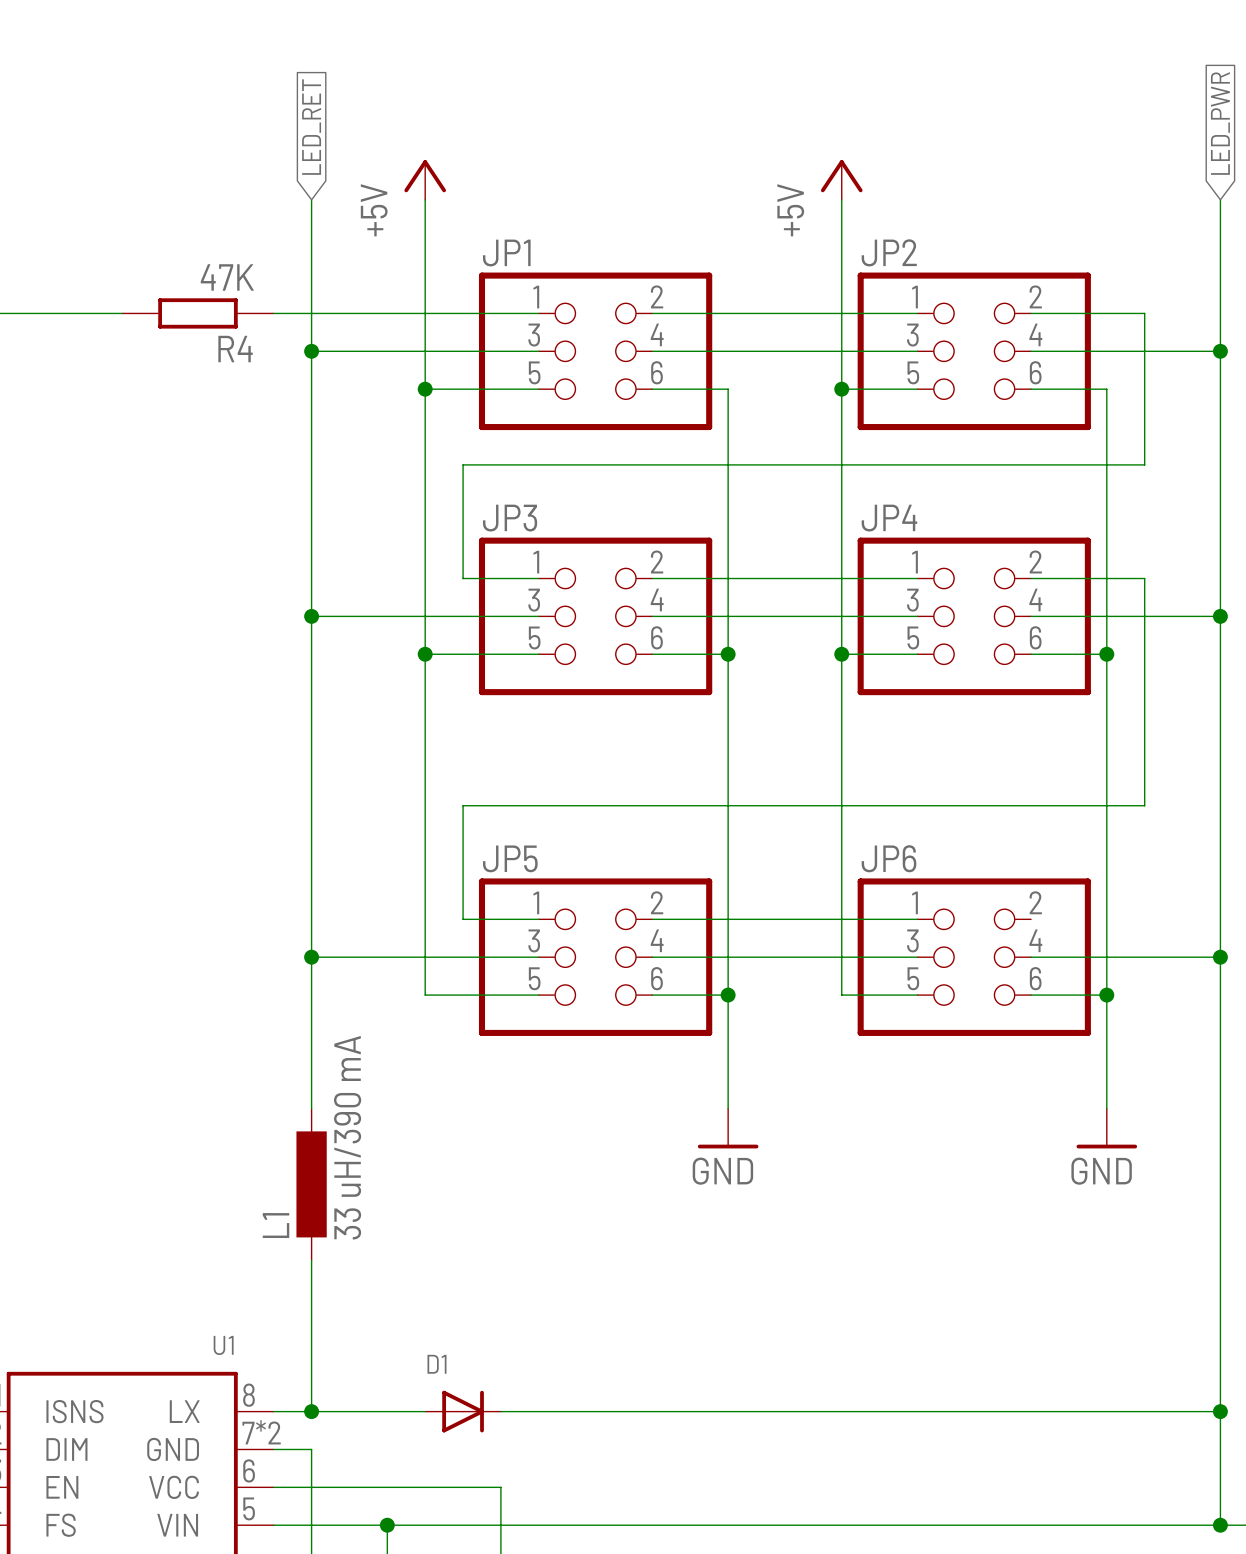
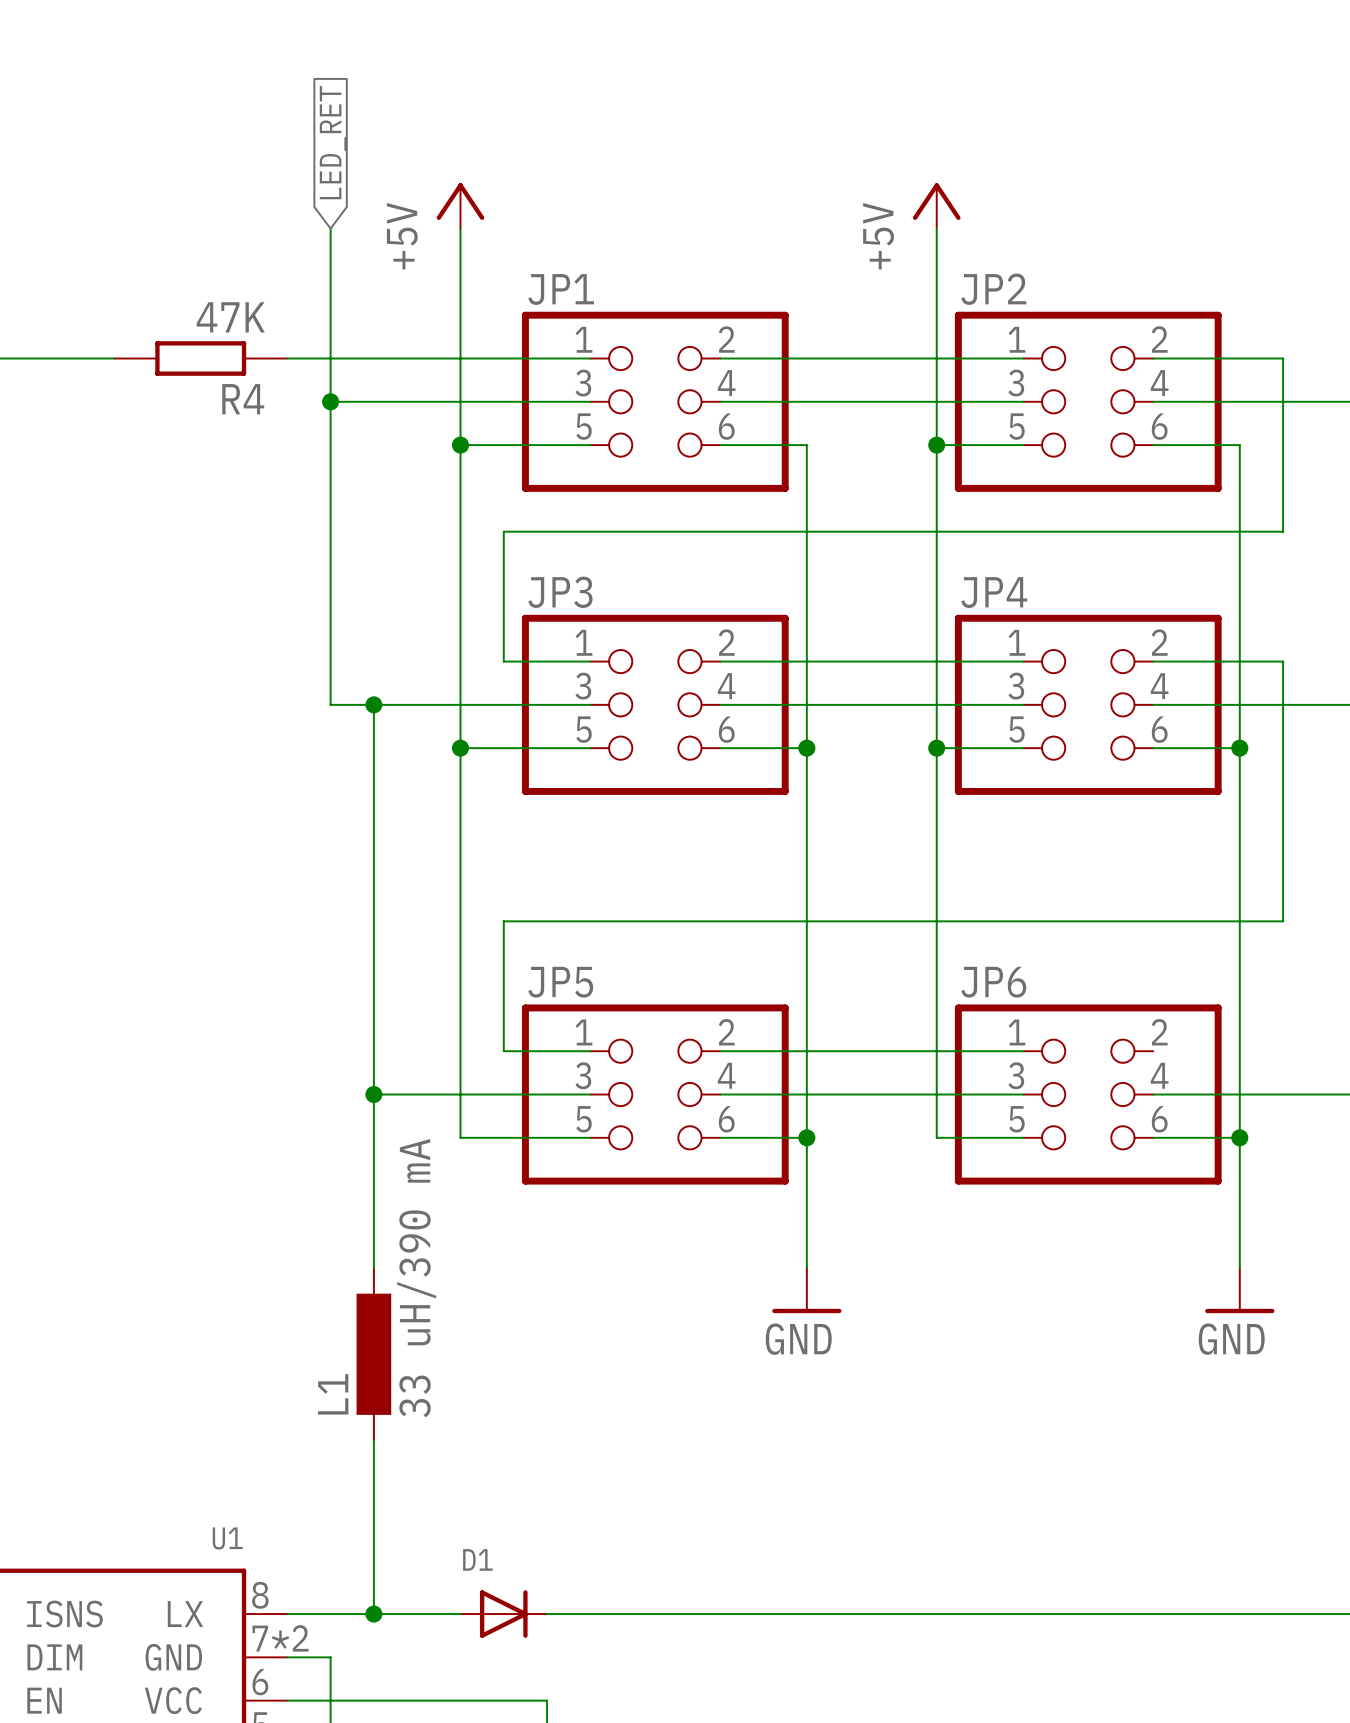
wire: (311, 616) (311, 1108) -> (373, 704) (373, 1267)
junction position: (311, 616) -> (373, 704)
wire: (311, 957) (349, 957) -> none
junction position: (311, 957) -> (373, 1094)
L1 position: (311, 1184) -> (373, 1354)
wire: (311, 1260) (311, 1411) -> (373, 1440) (373, 1614)
junction position: (311, 1411) -> (373, 1614)

